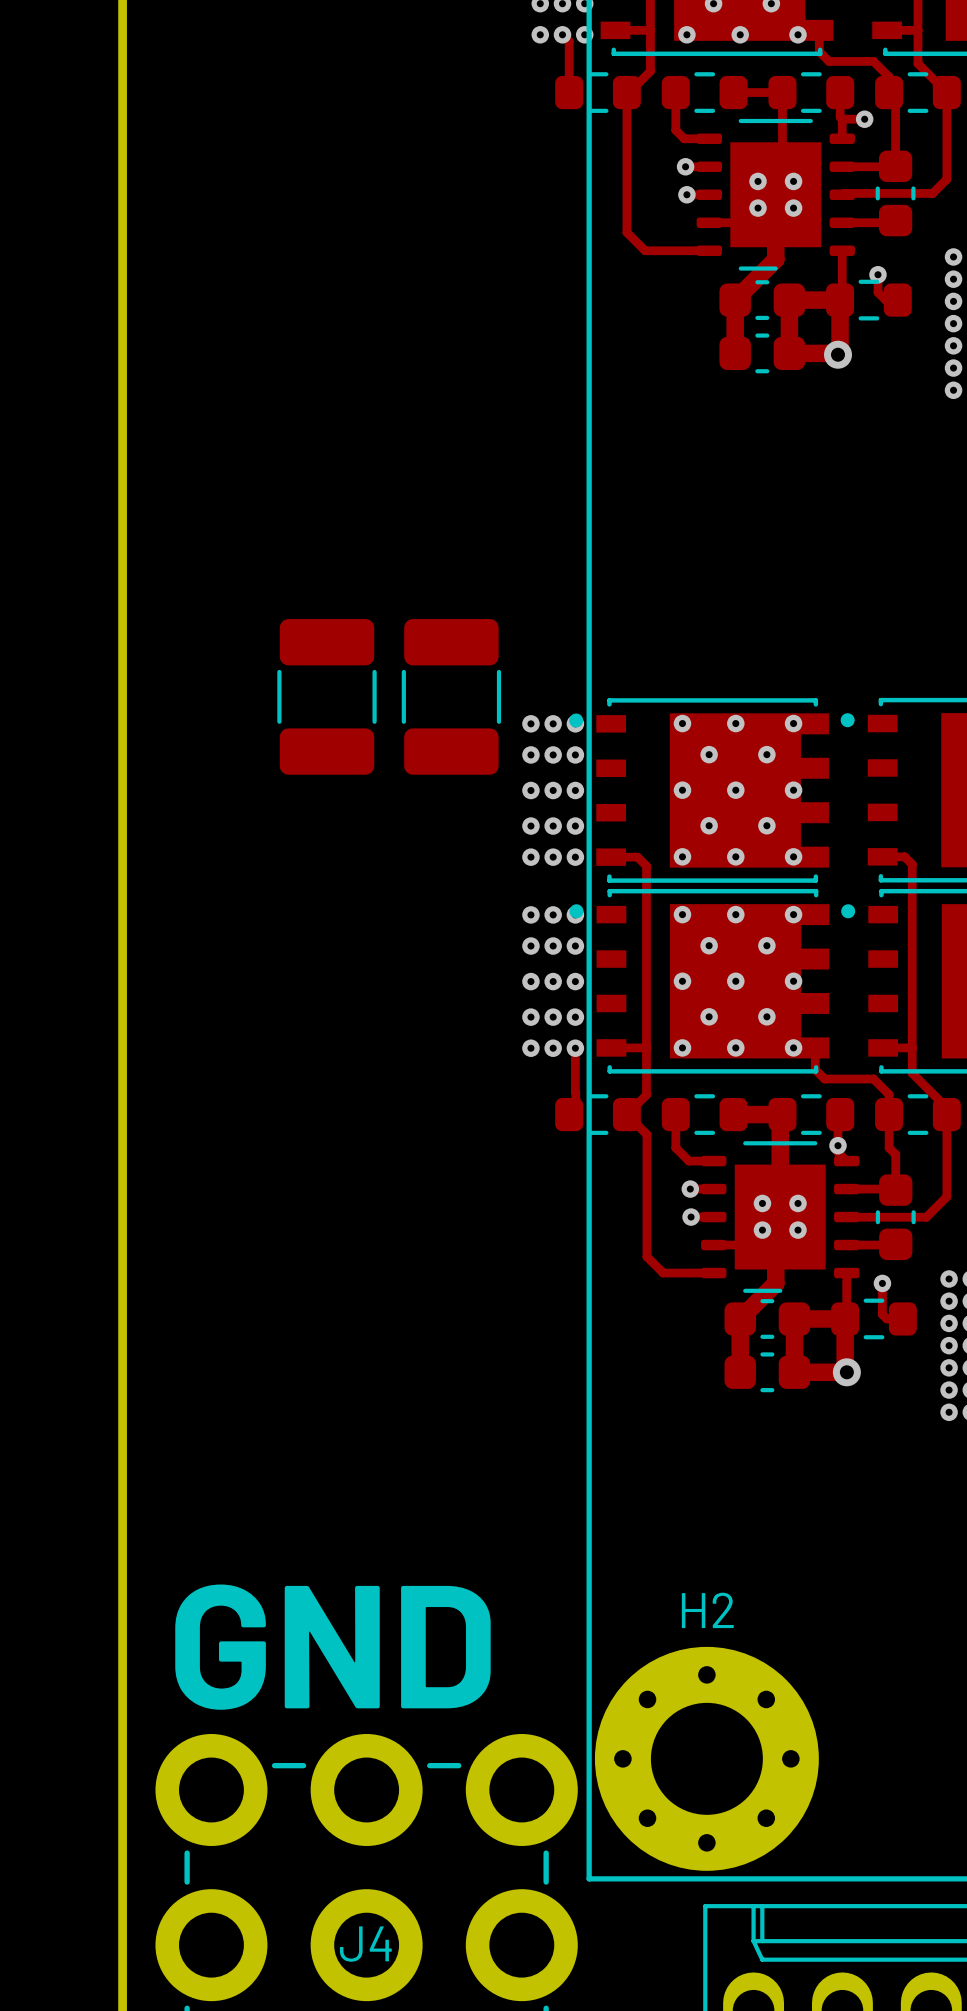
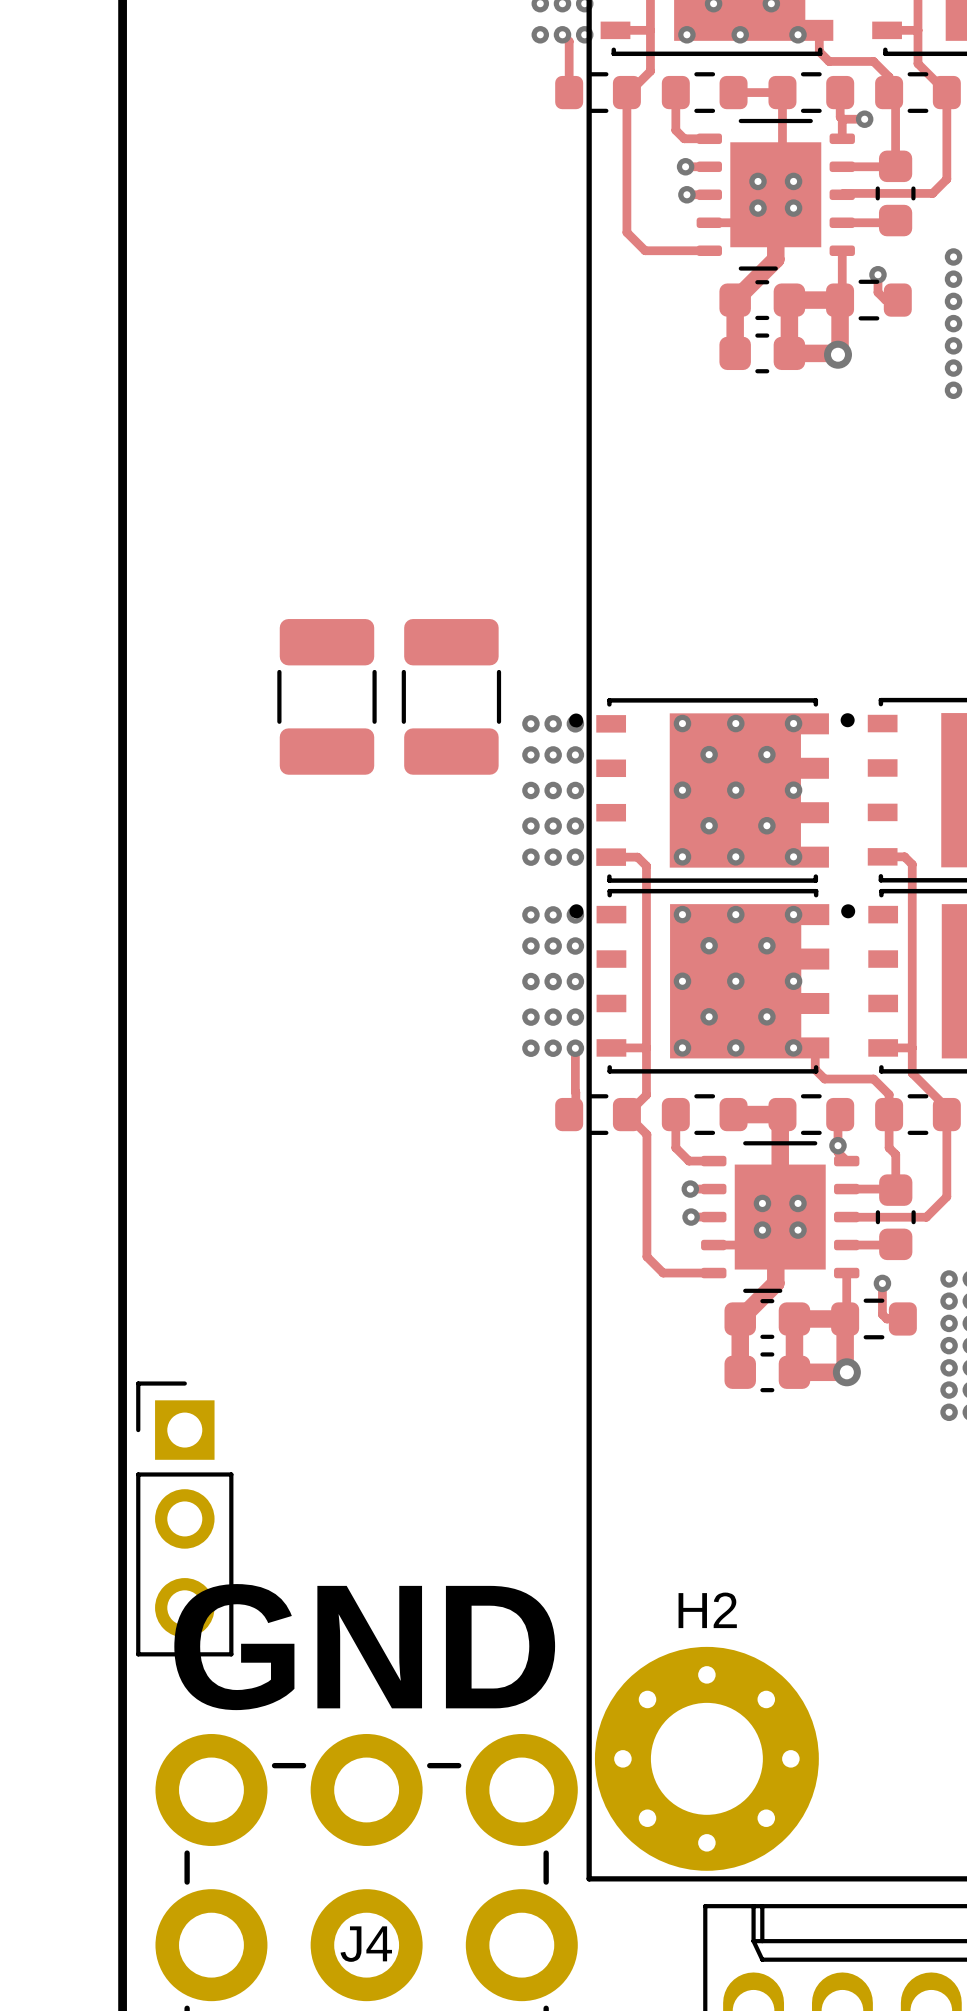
part: none -> (184, 1518)

